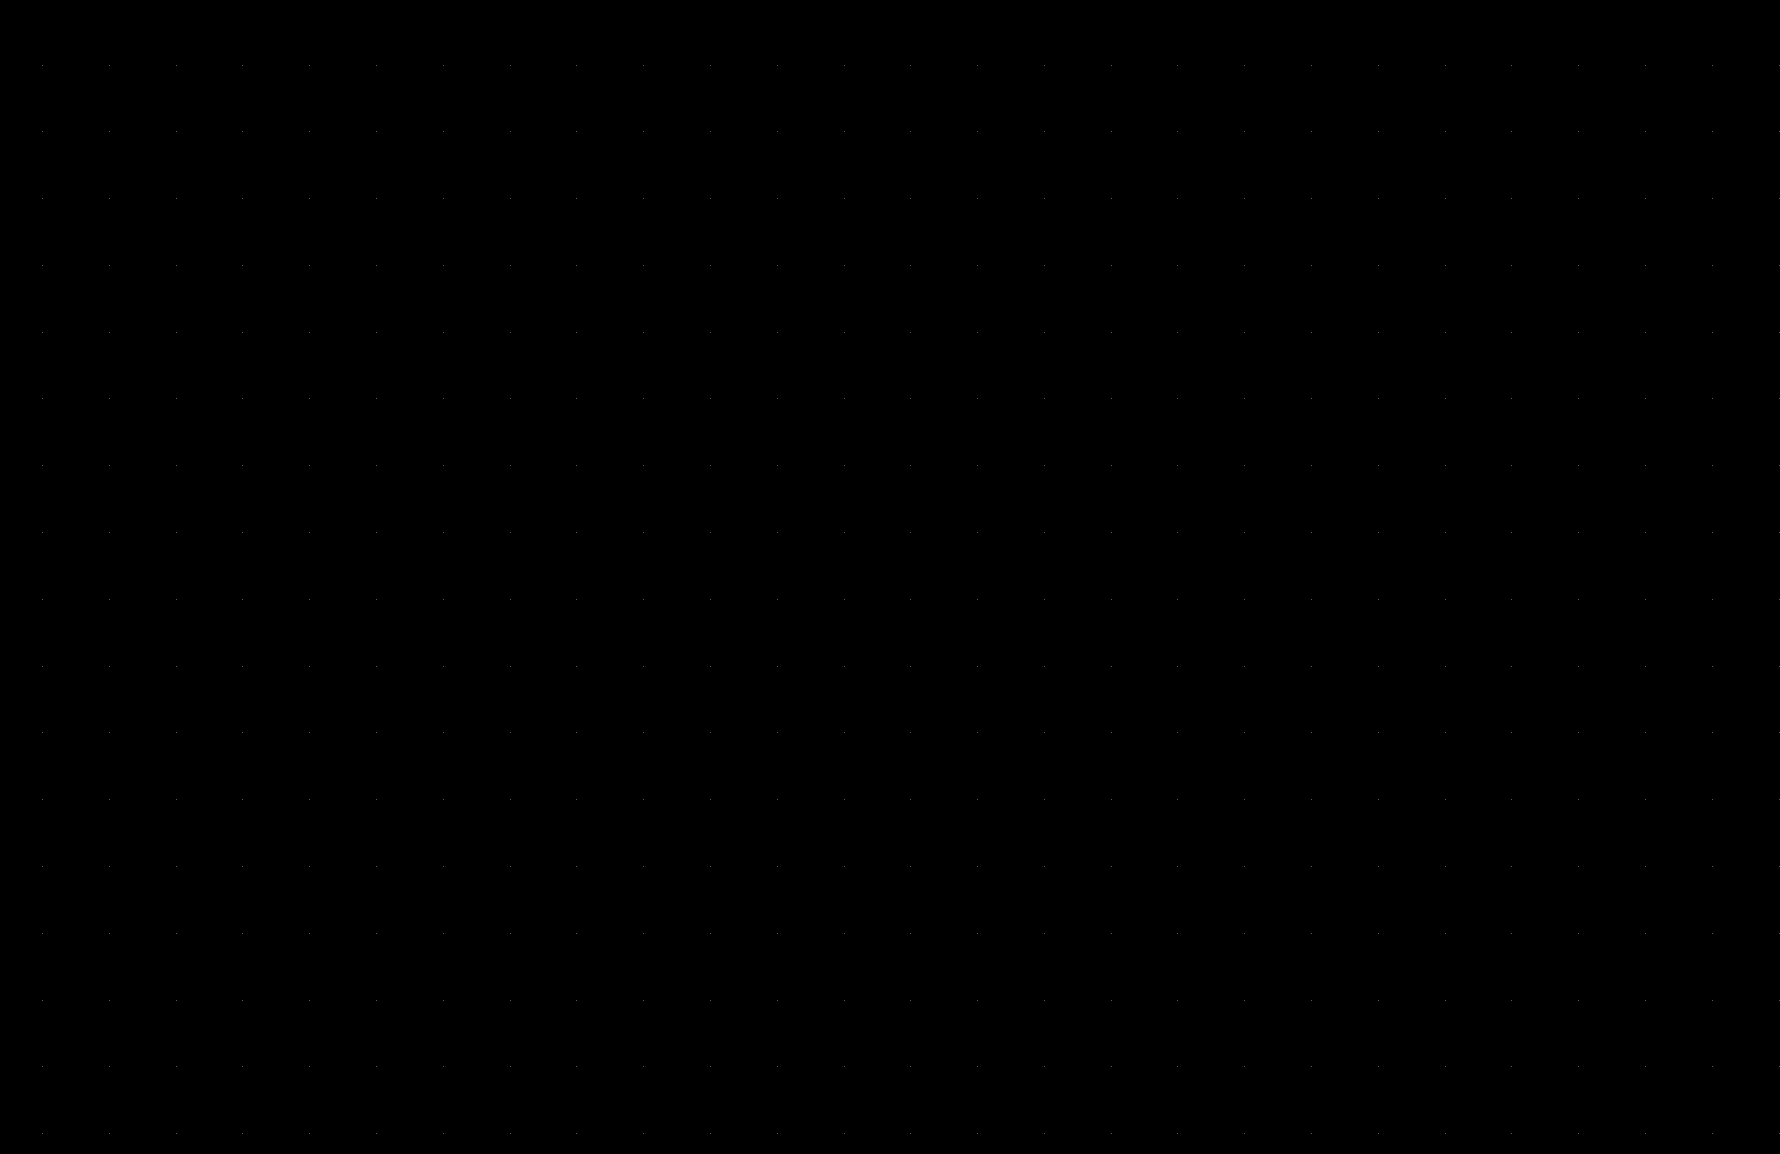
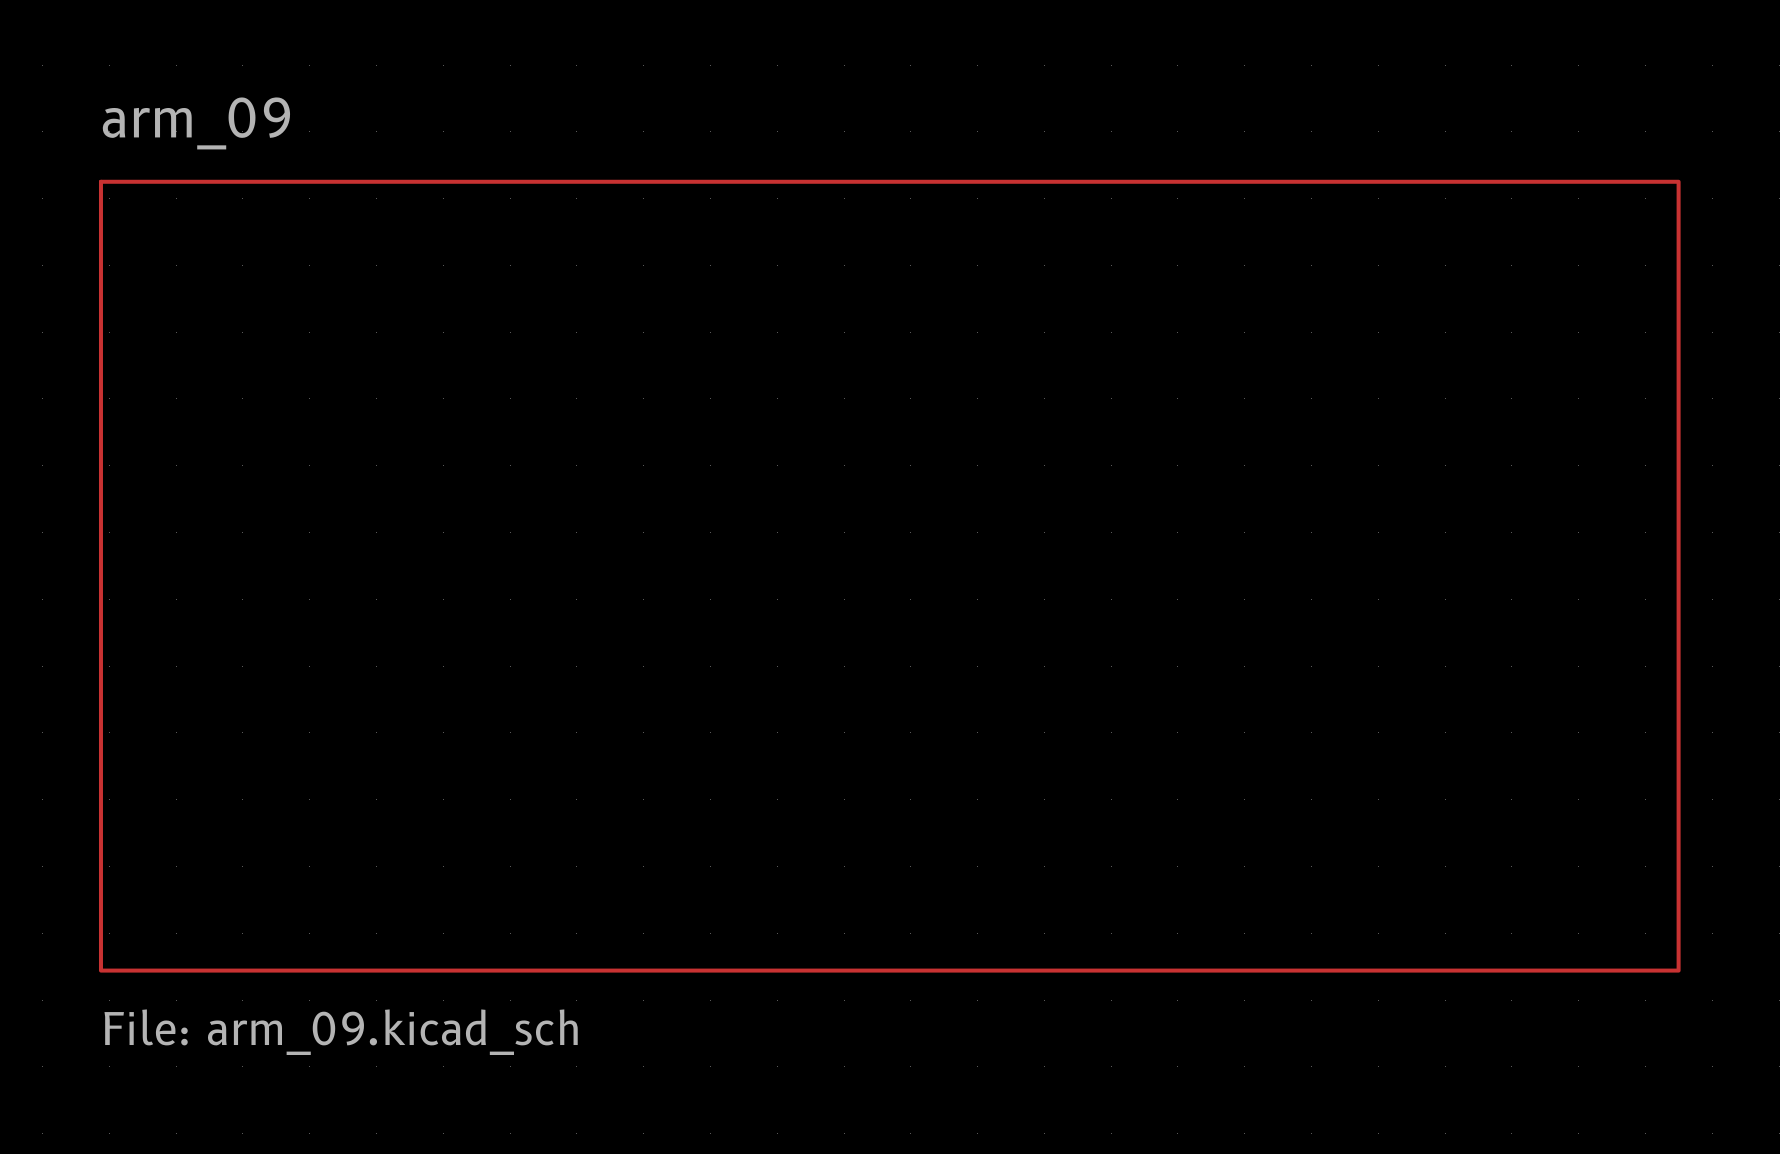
sheet arm_09: none -> File: arm_09.kicad_sch (889, 576)

